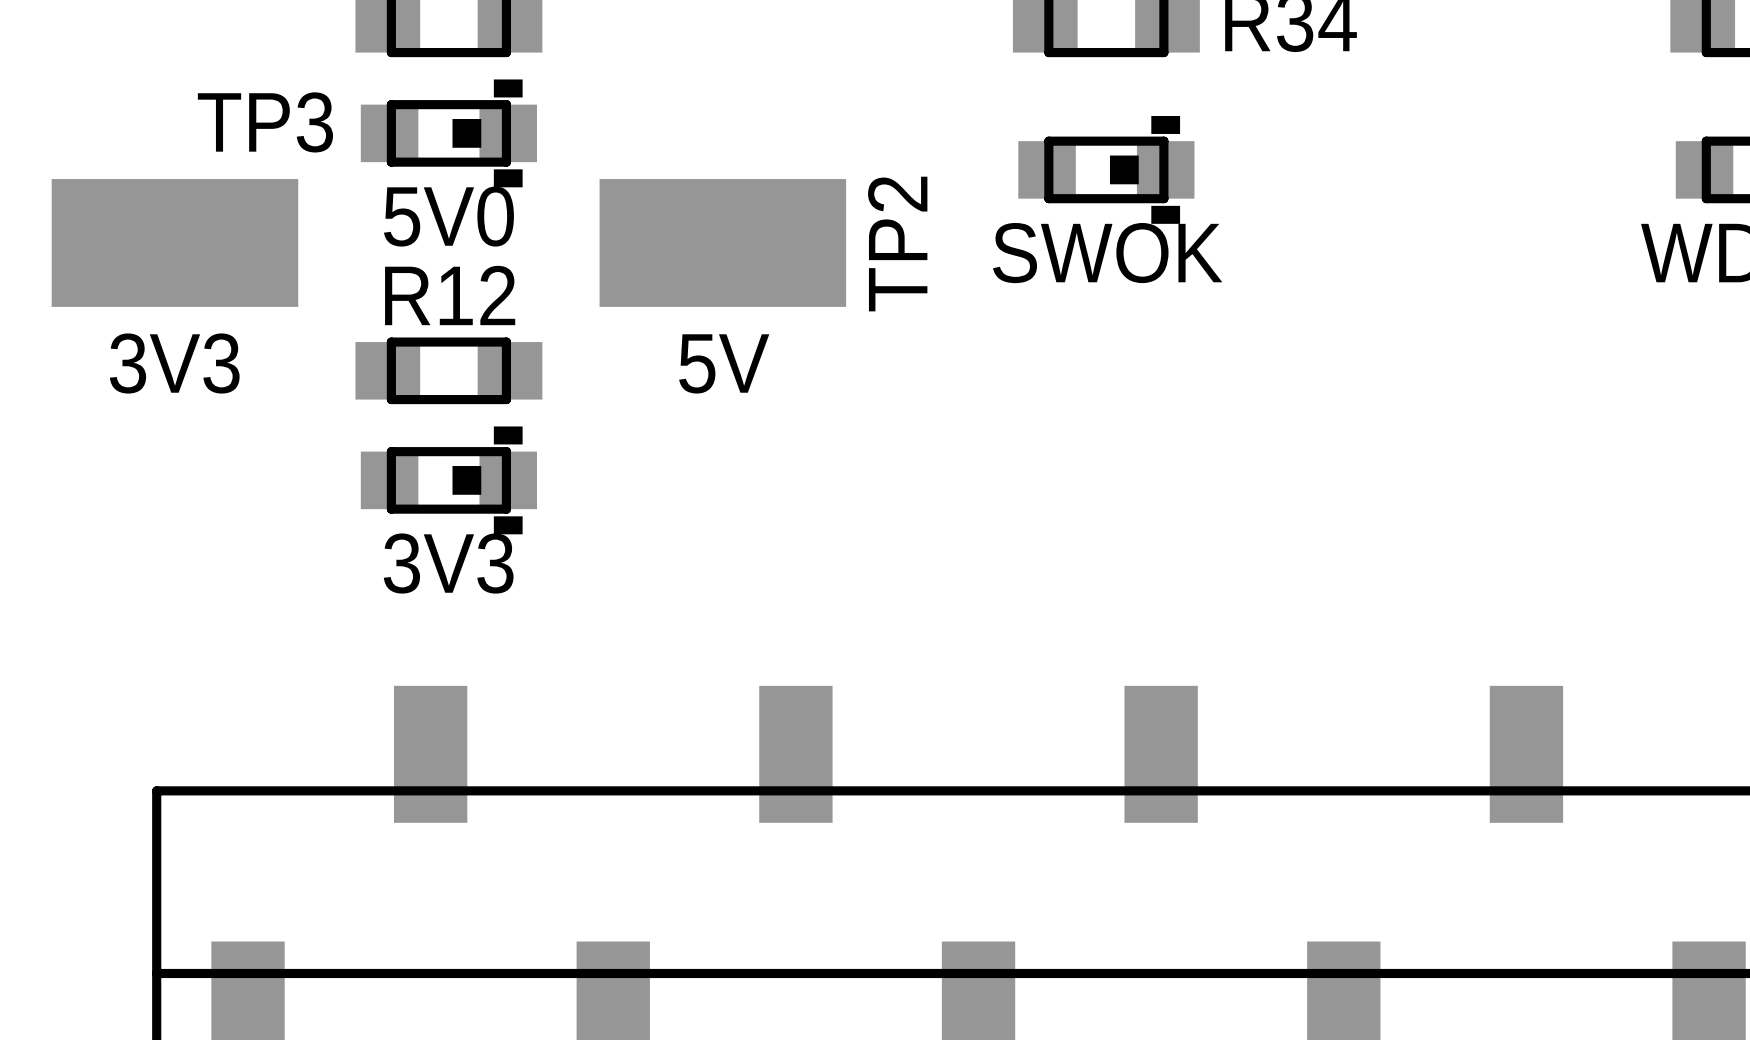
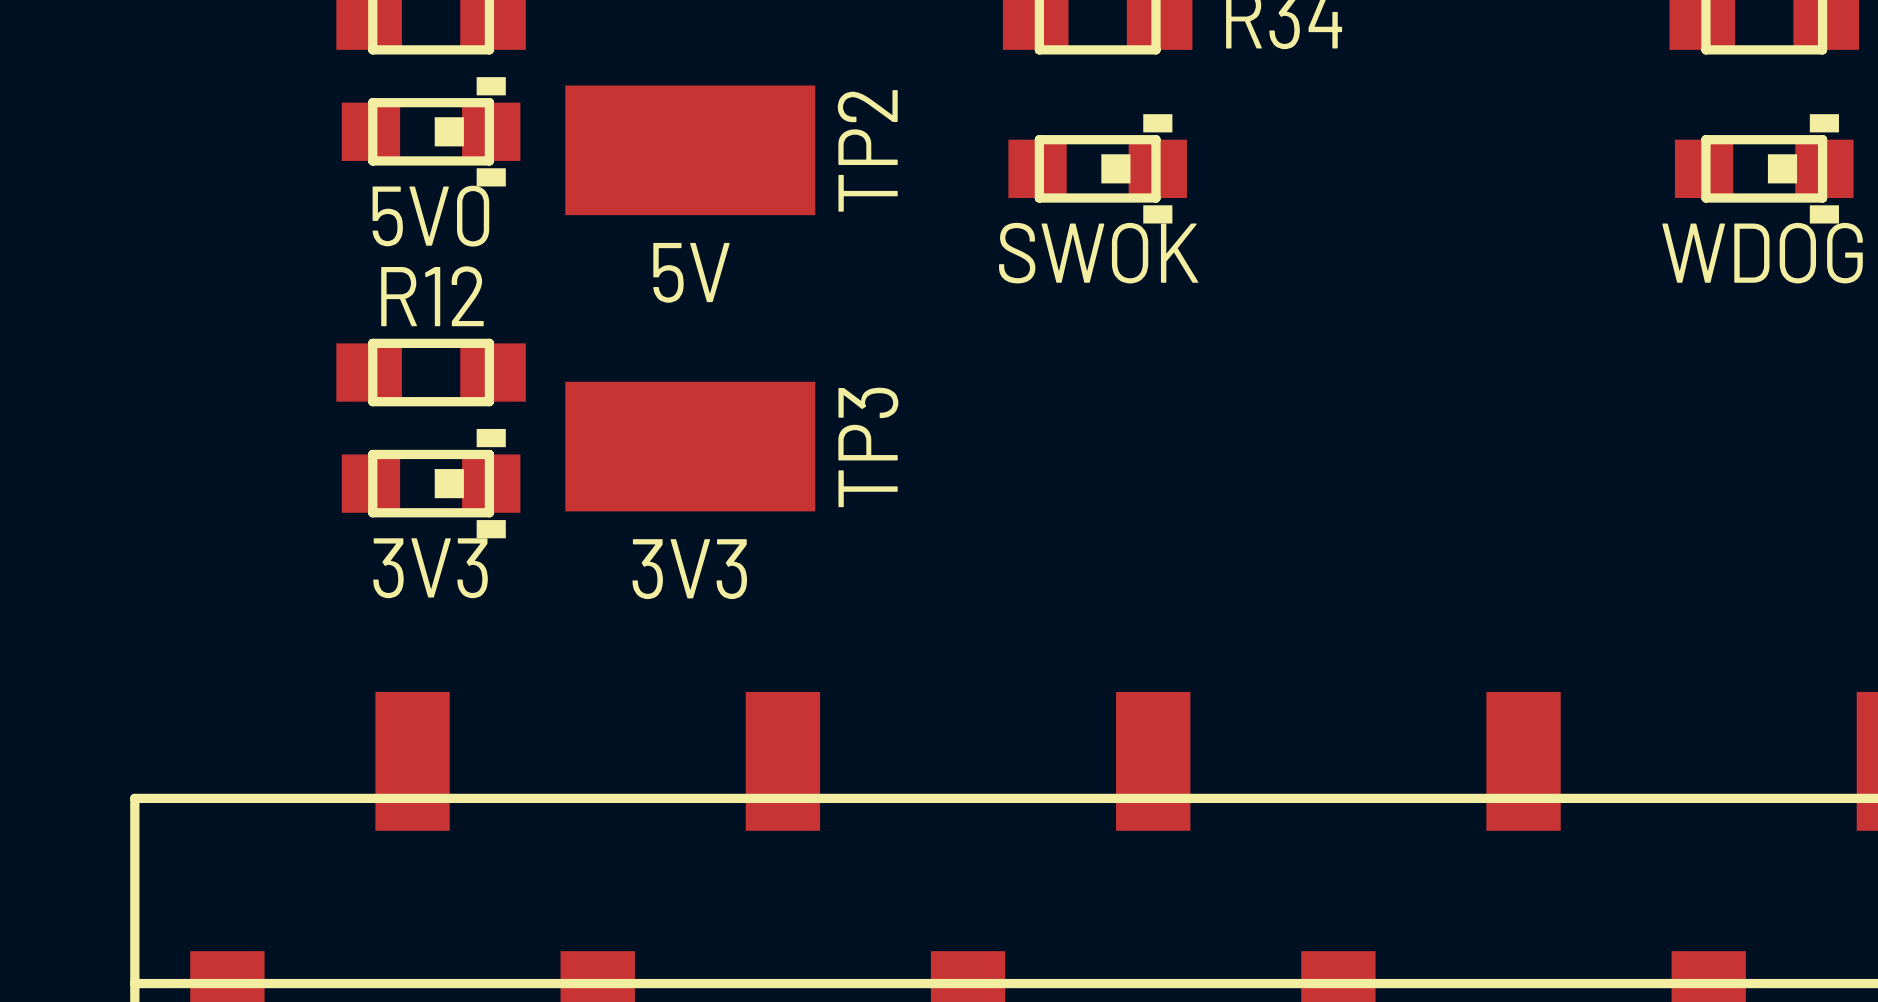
TP3 name rotation: 0° (265, 122) -> 90° counterclockwise (868, 447)
TP3 position: (174, 242) -> (690, 446)
TP2 position: (722, 242) -> (690, 150)

